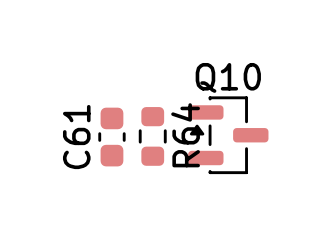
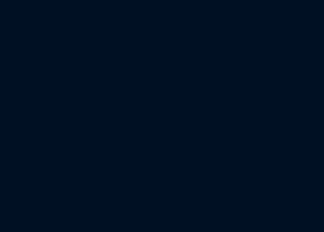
Q10: (228, 135) -> none
R64: (152, 136) -> none
C61: (111, 137) -> none

